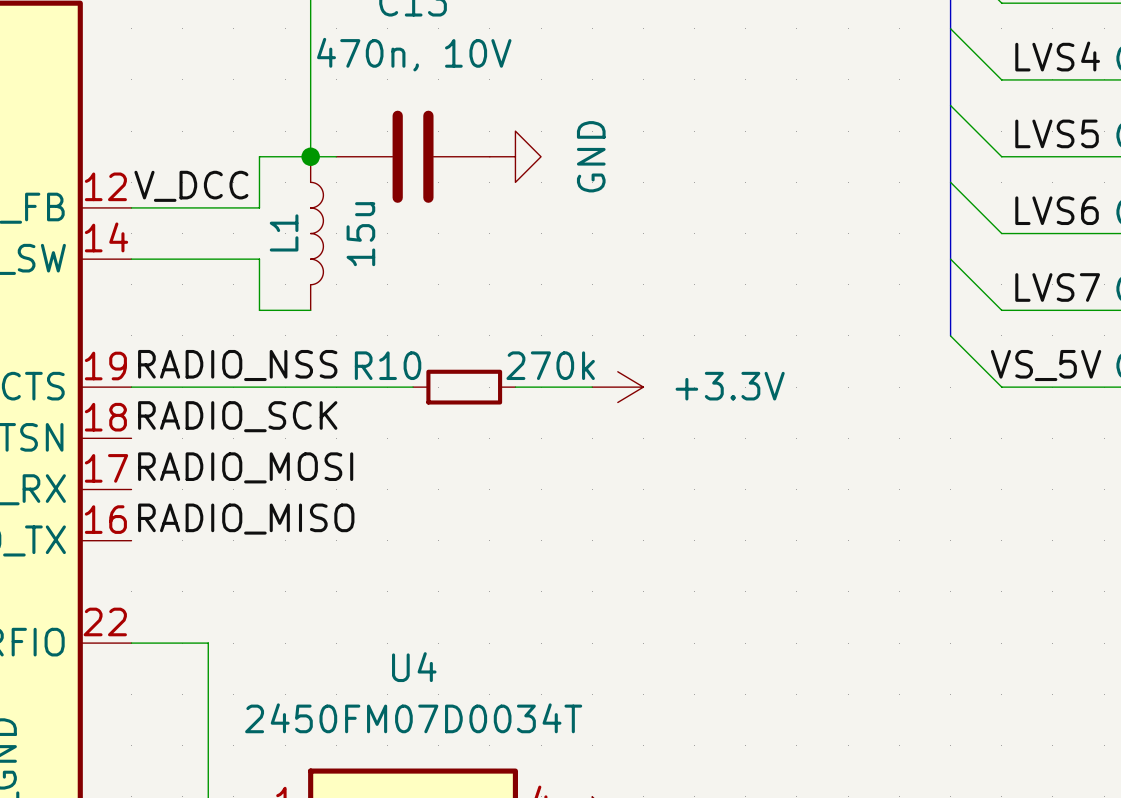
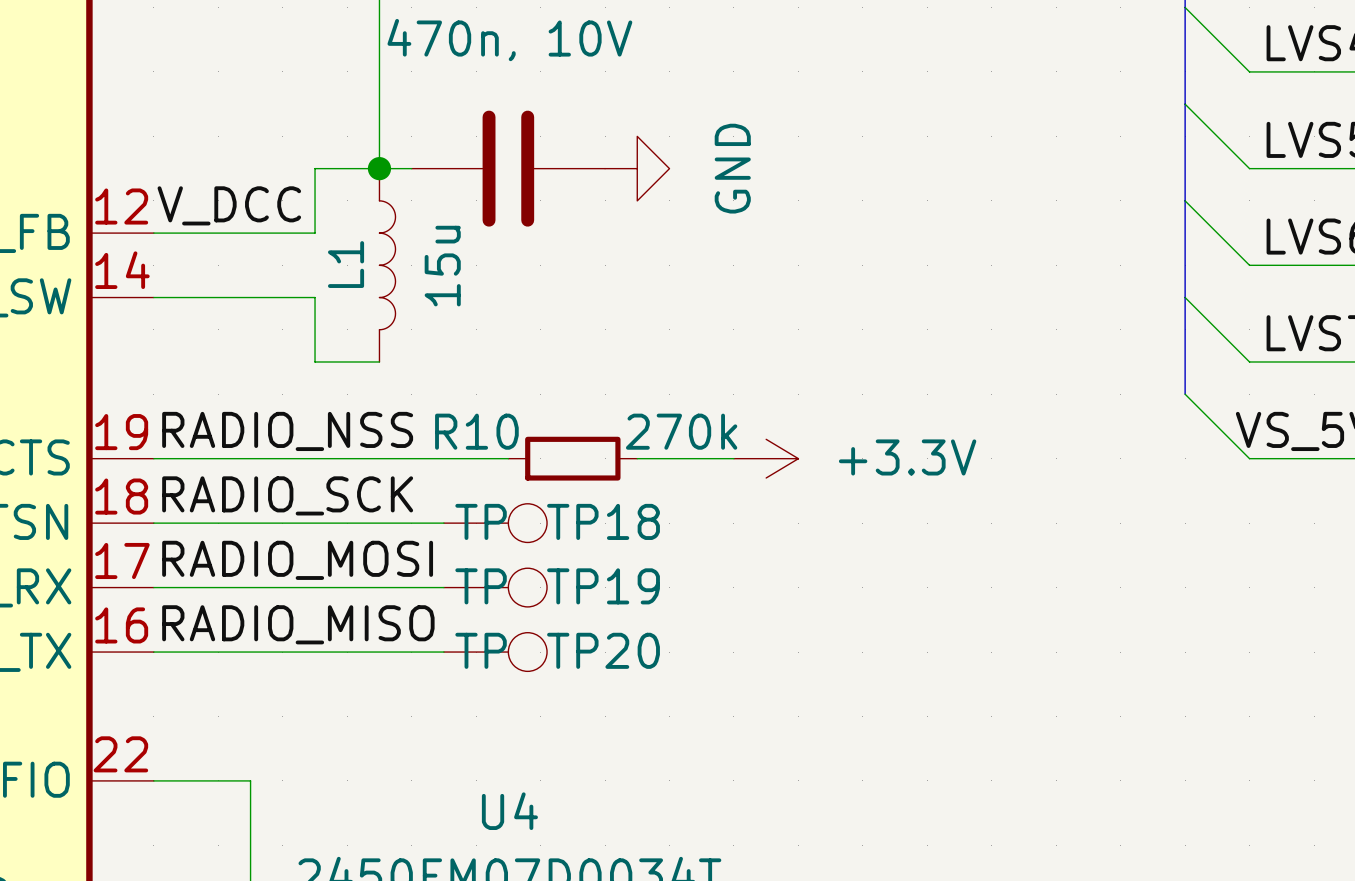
wire: none -> (153, 523) (443, 523)
TP18: none -> TP (495, 523)
wire: none -> (153, 587) (443, 587)
TP19: none -> TP (495, 587)
wire: none -> (153, 652) (443, 652)
TP20: none -> TP (495, 652)

